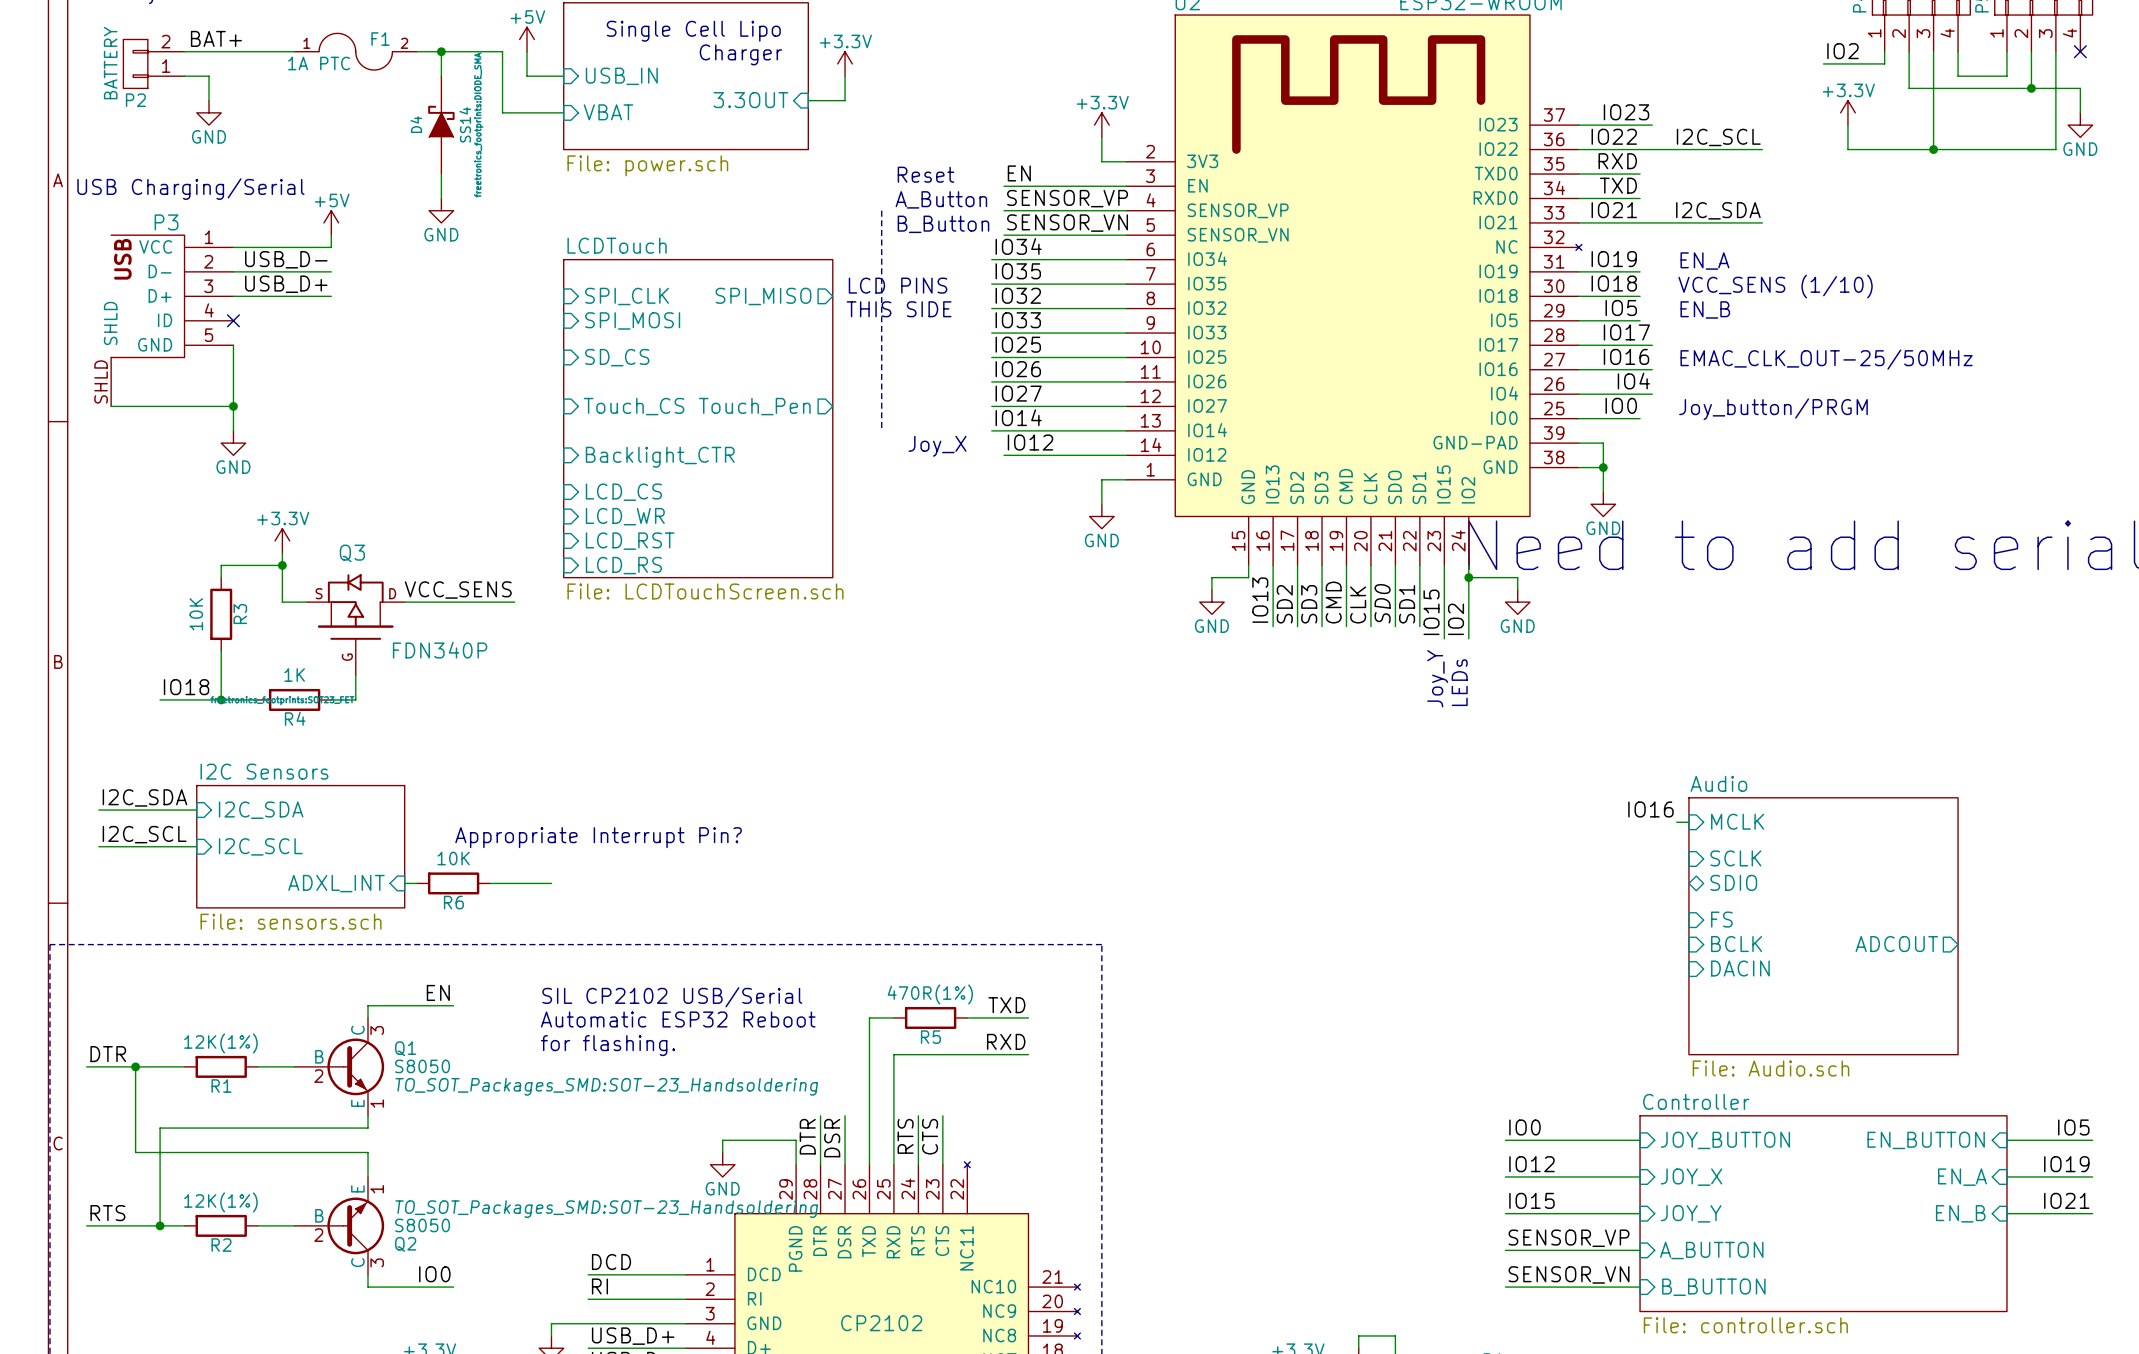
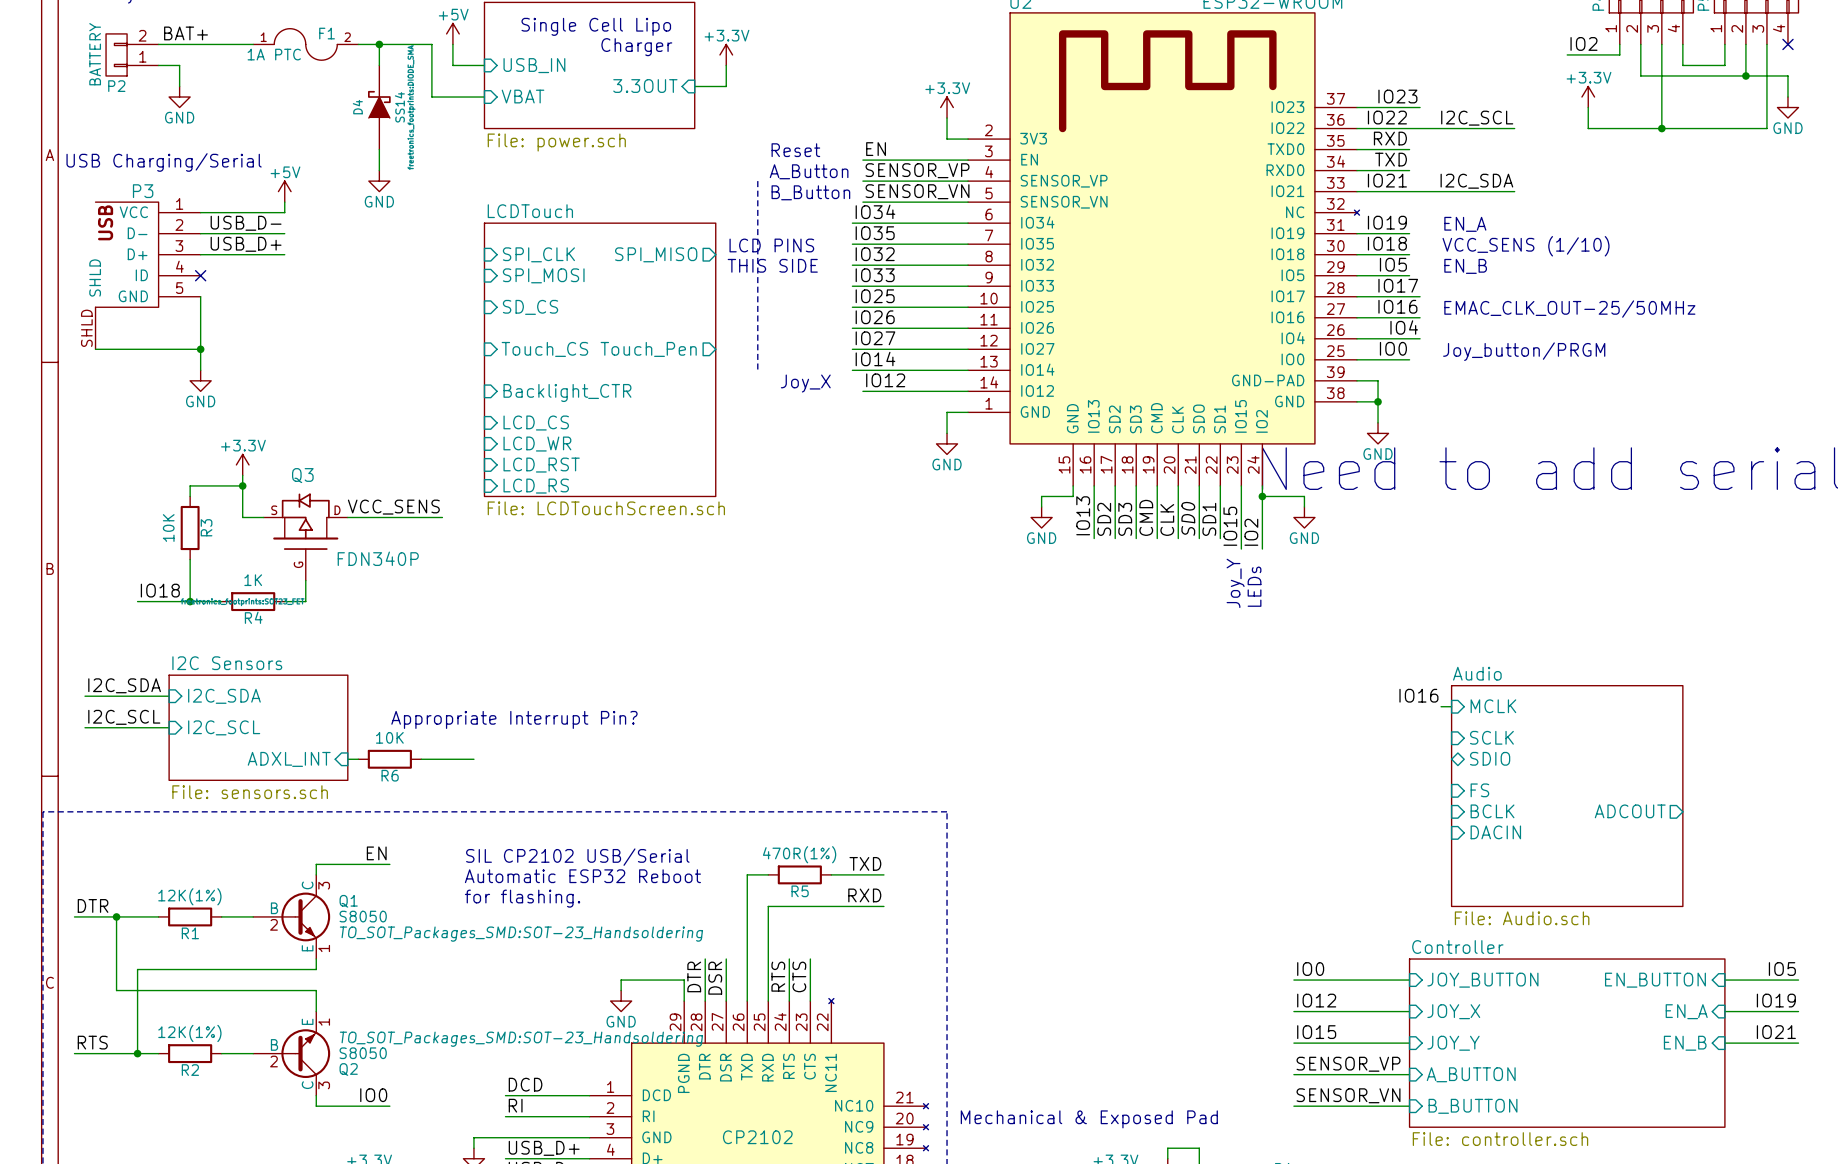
text: none -> Mechanical & Exposed Pad (1089, 1119)

